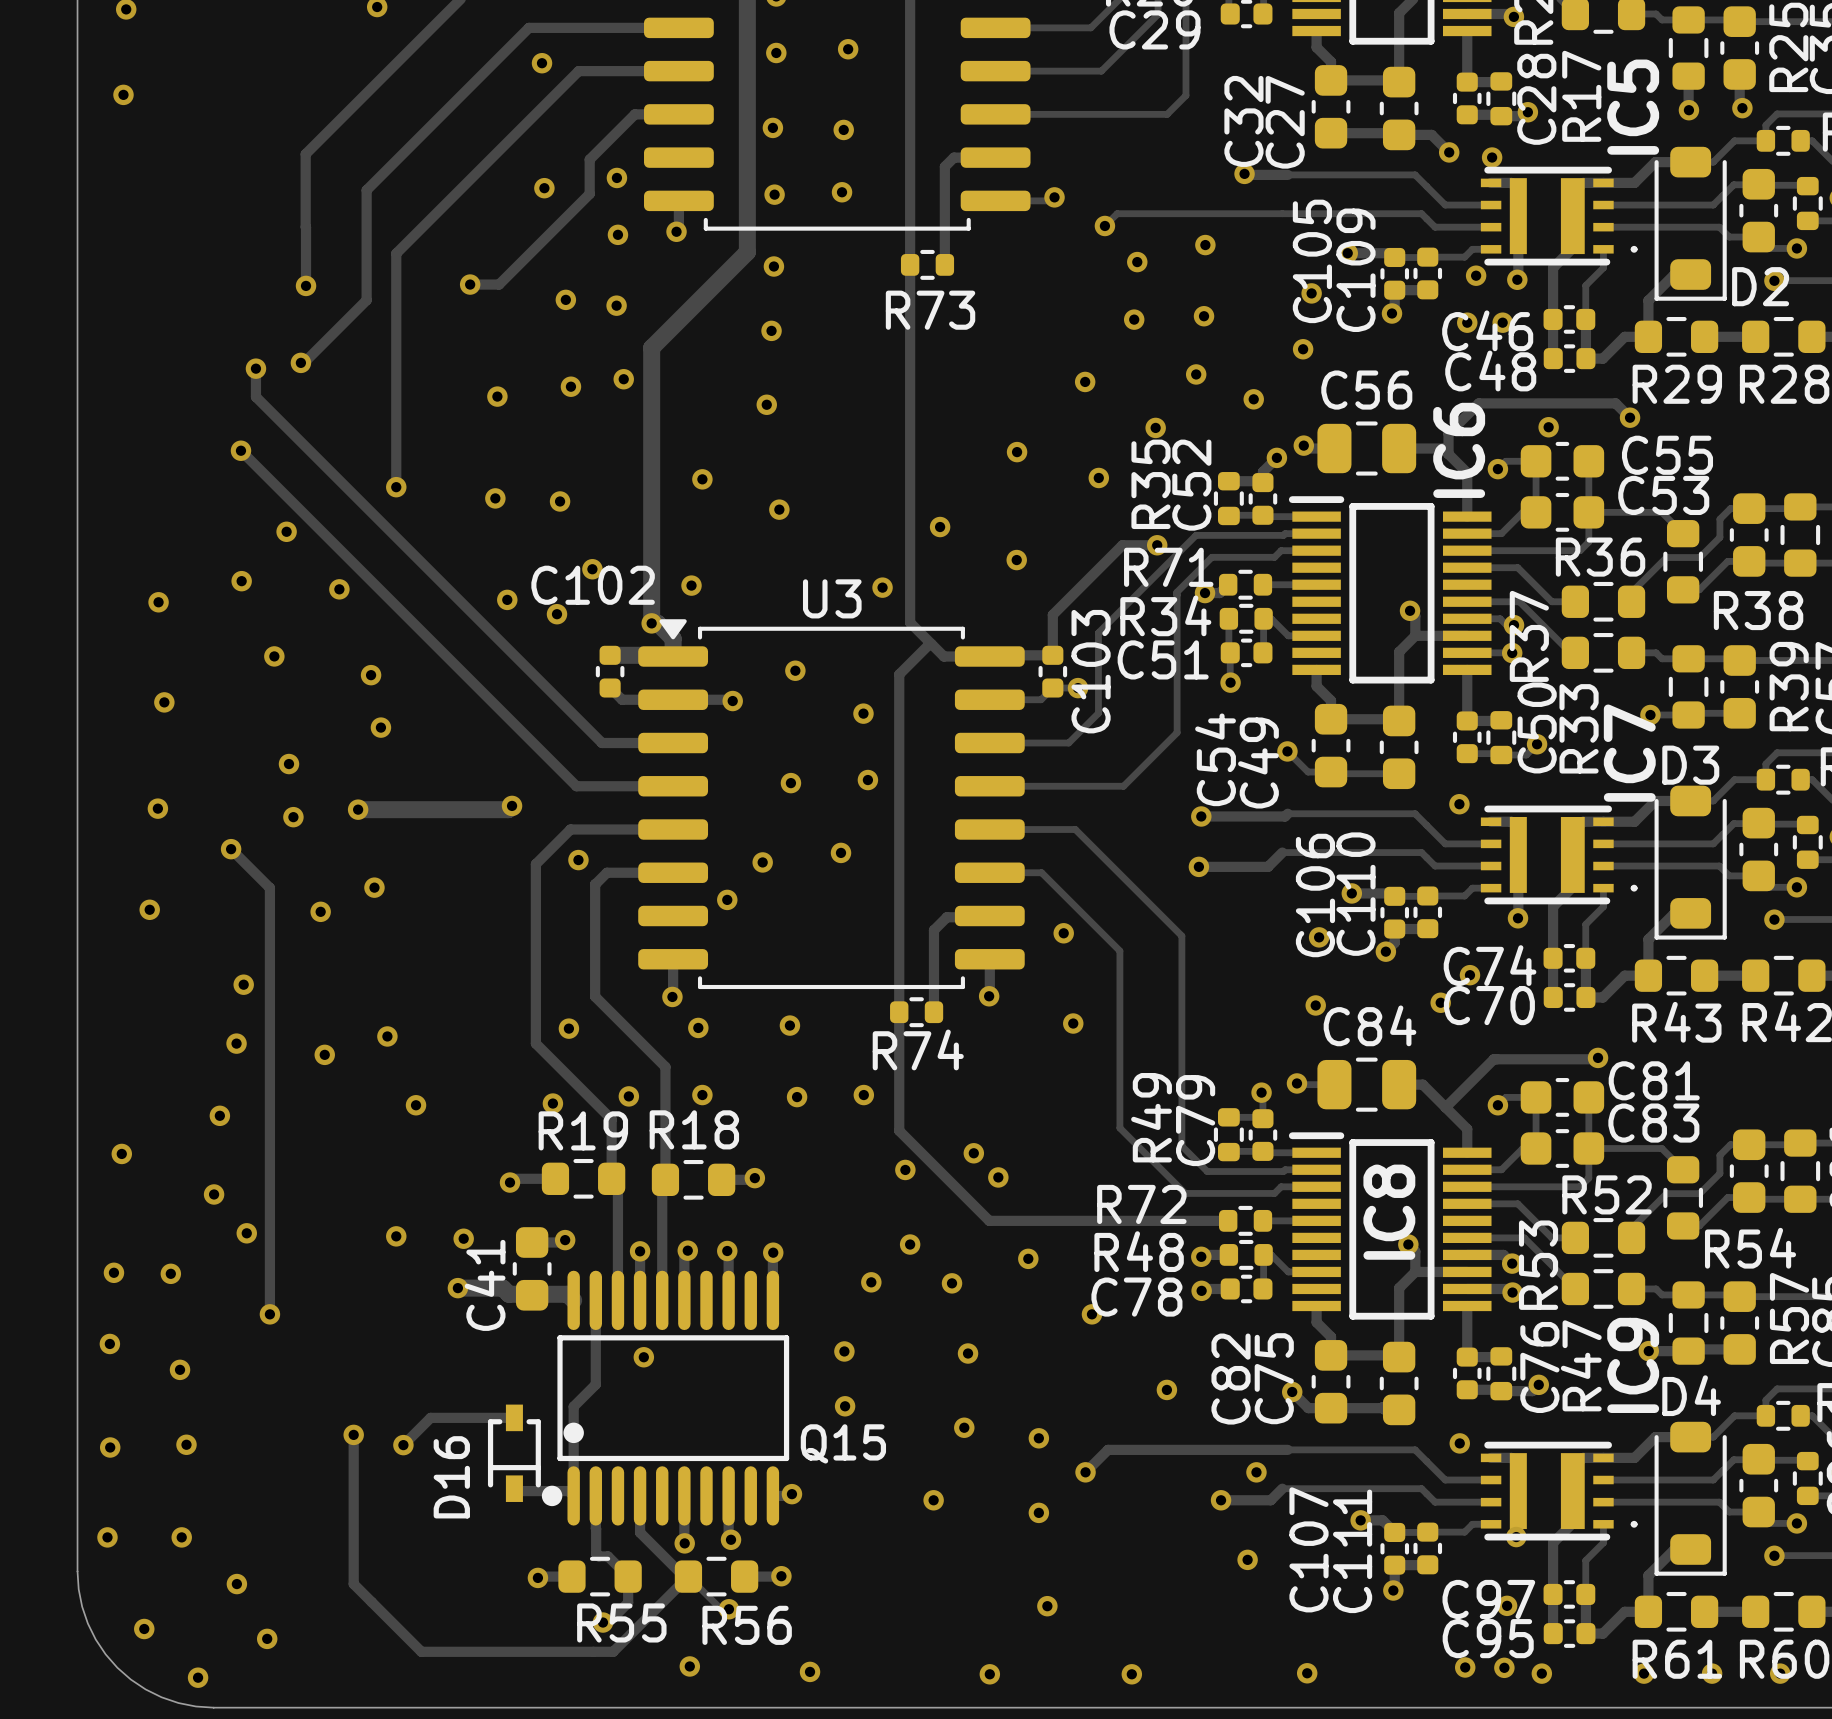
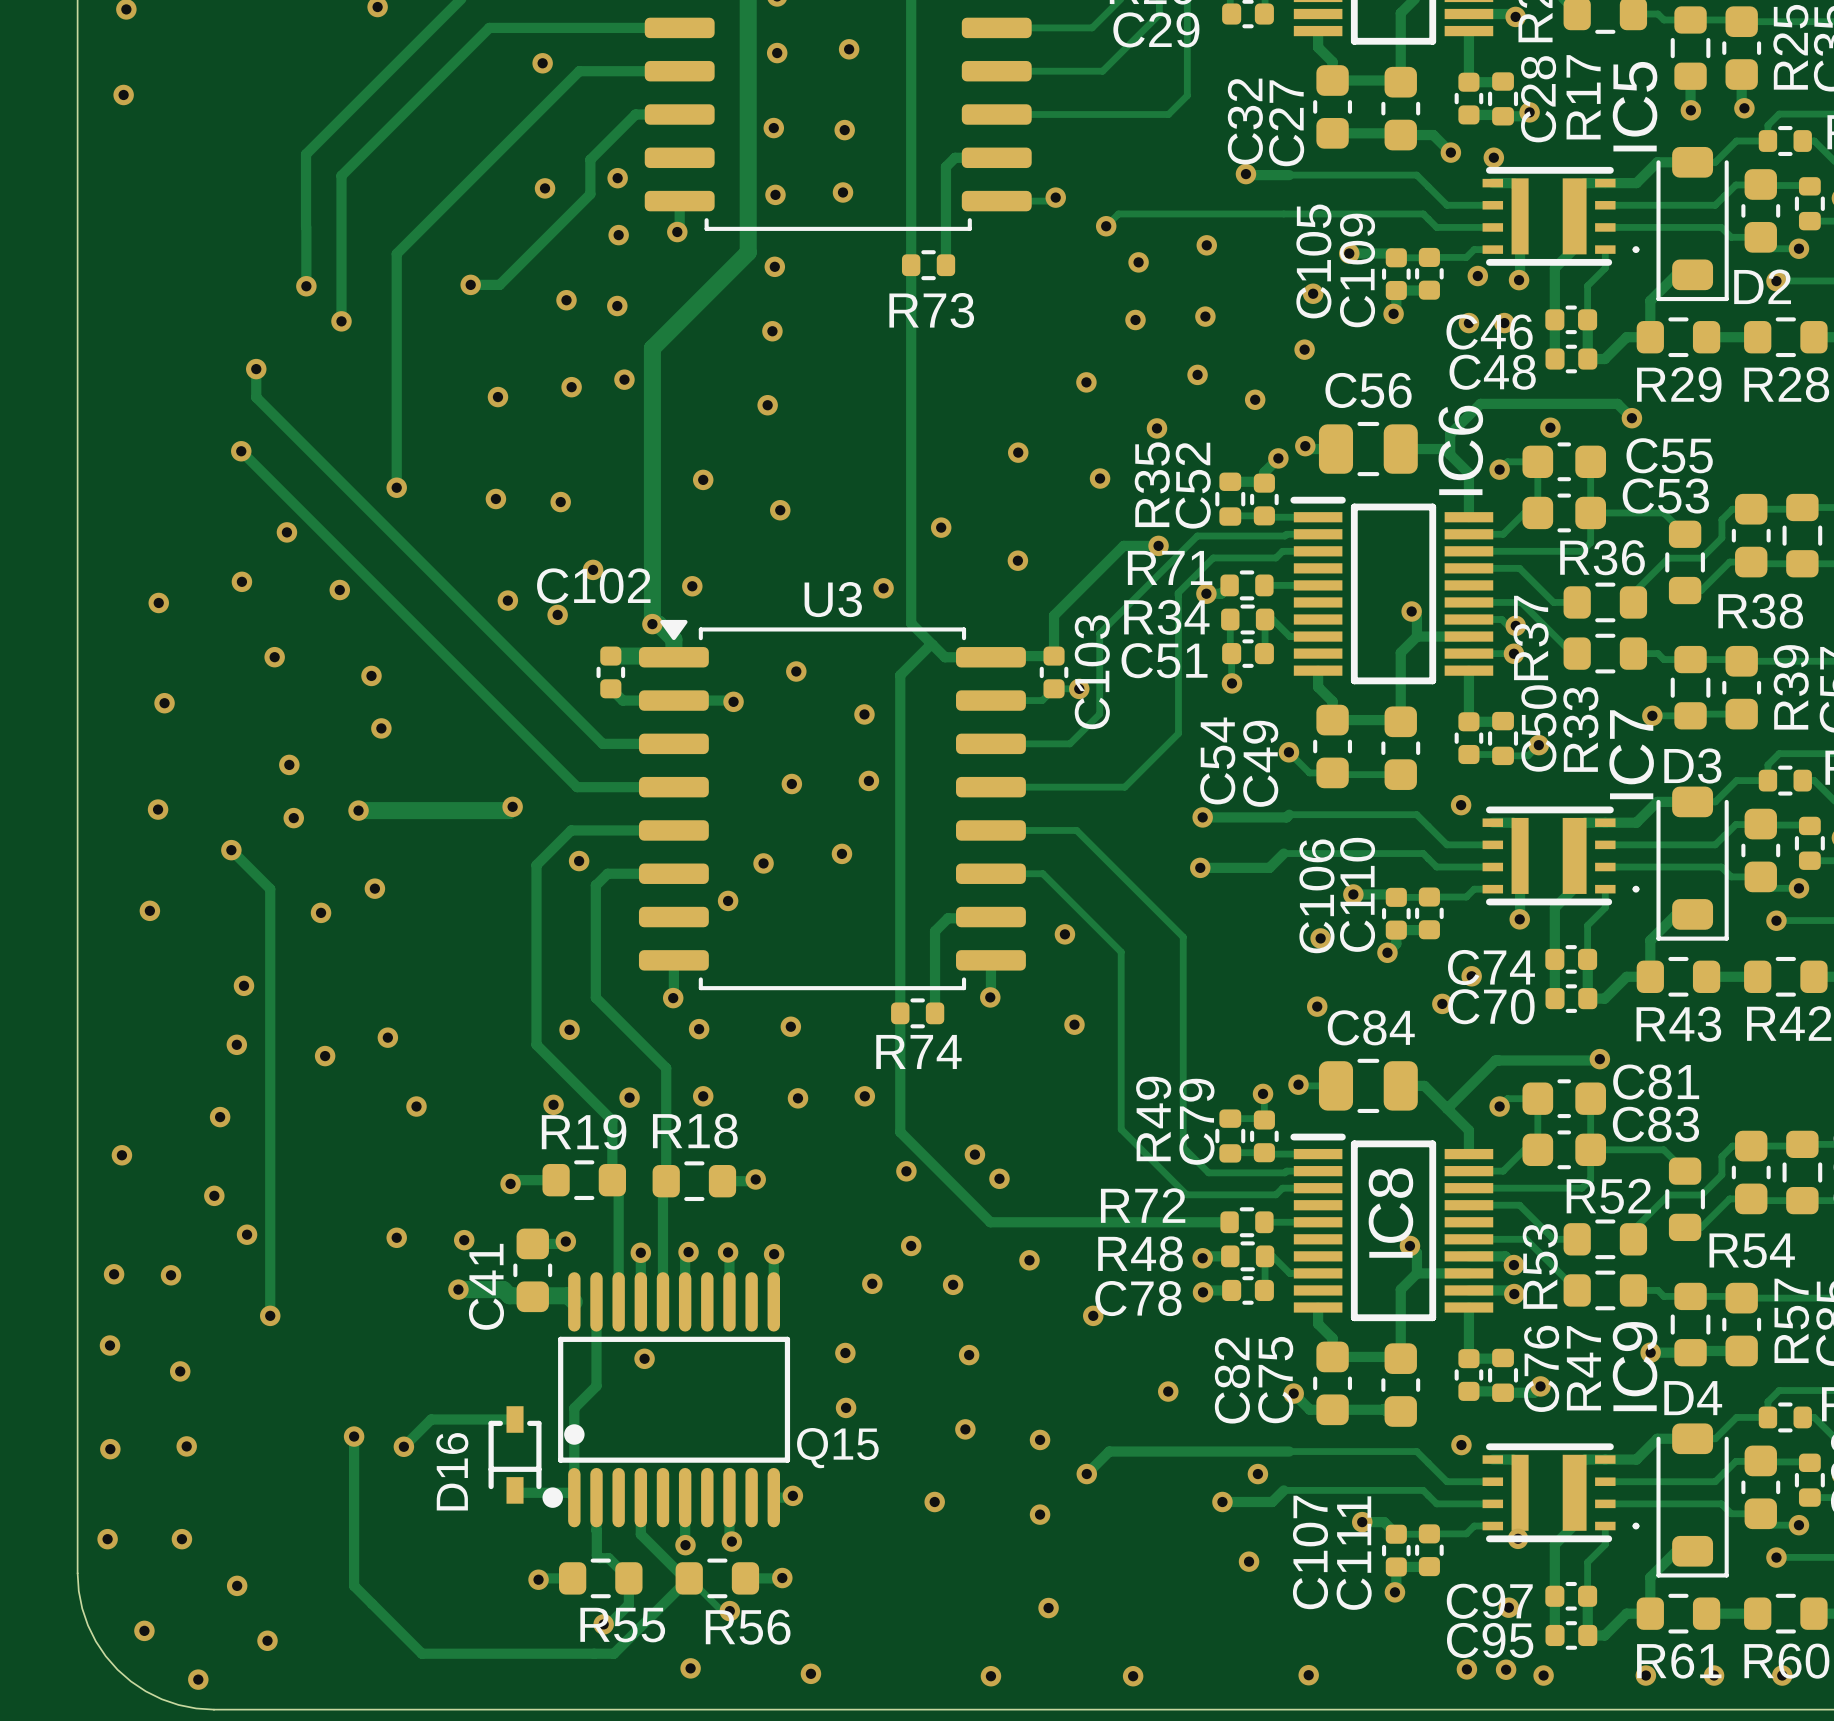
track: (528, 27) (366, 190) (366, 300) (303, 362) (300, 362) -> (529, 27) (489, 27) (341, 175) (341, 321)
via position: (300, 362) -> (341, 321)

